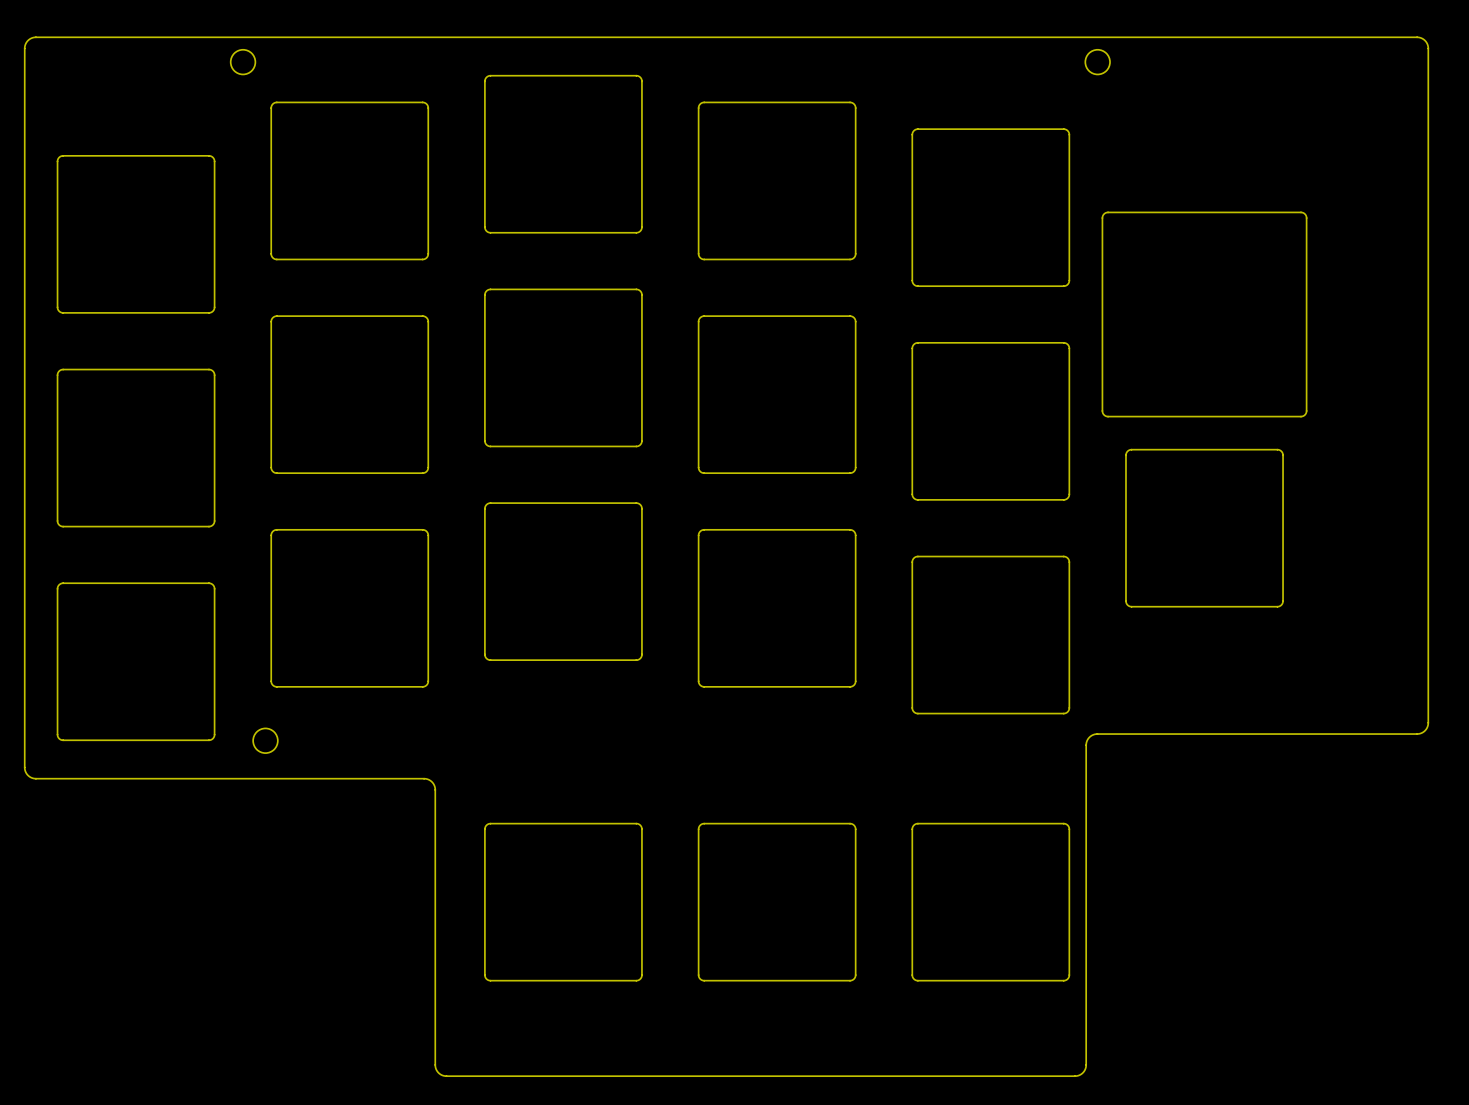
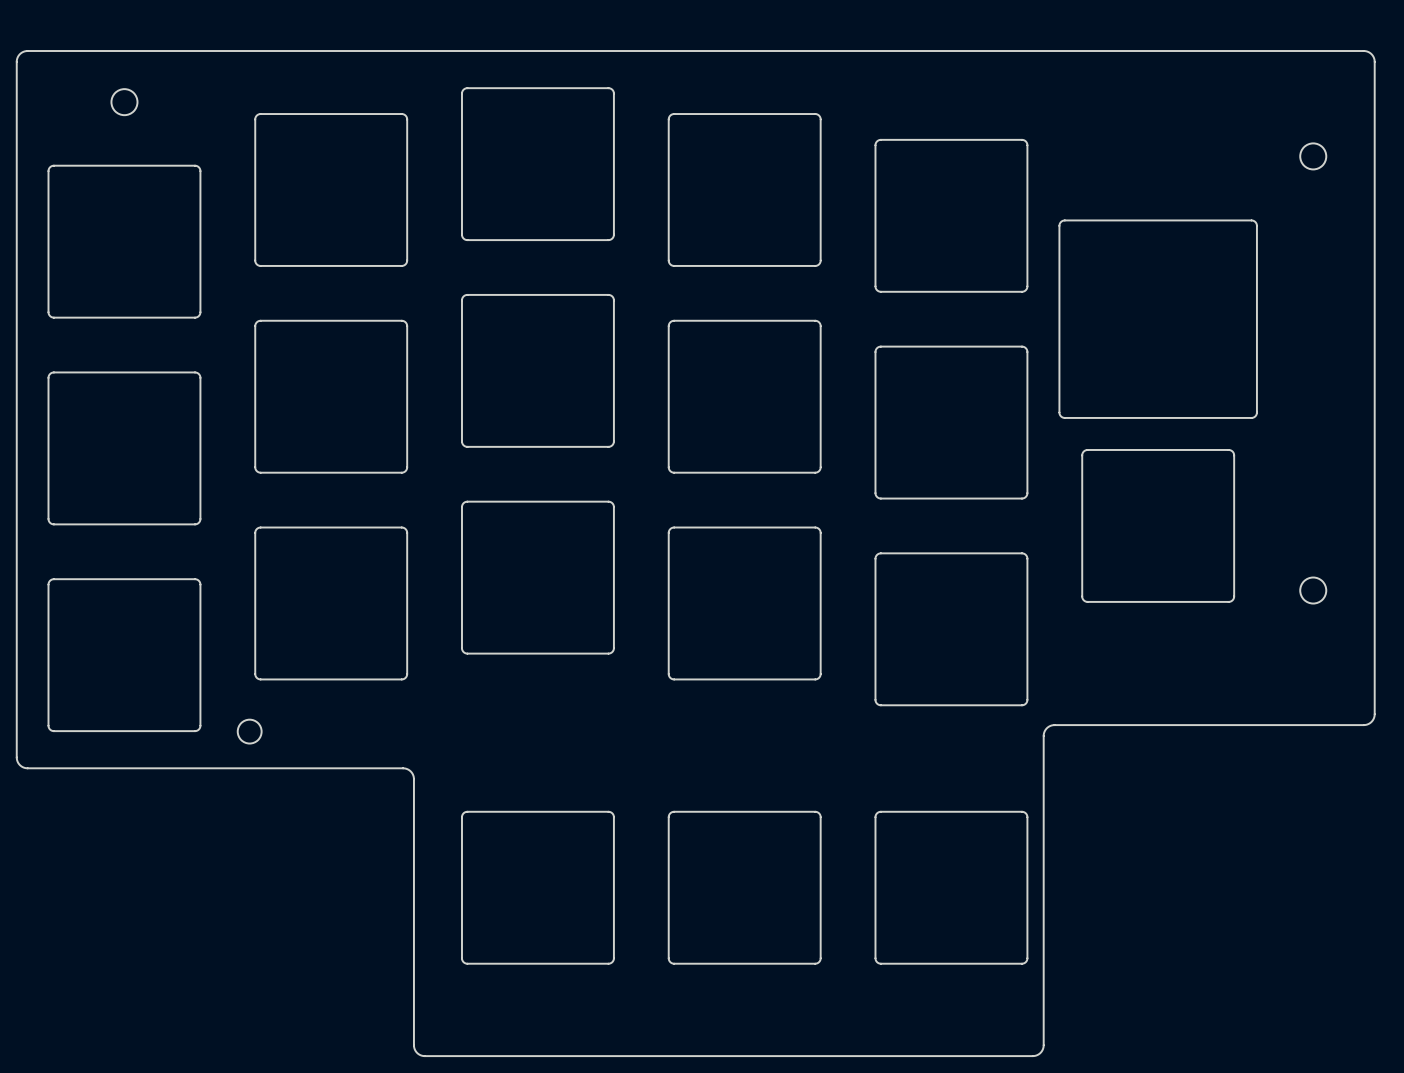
round board edge: [229, 48, 257, 76] -> none
round board edge: [1084, 48, 1111, 76] -> none
round board edge: none -> [110, 88, 139, 116]
round board edge: none -> [1299, 142, 1328, 171]
round board edge: none -> [1299, 576, 1328, 605]

